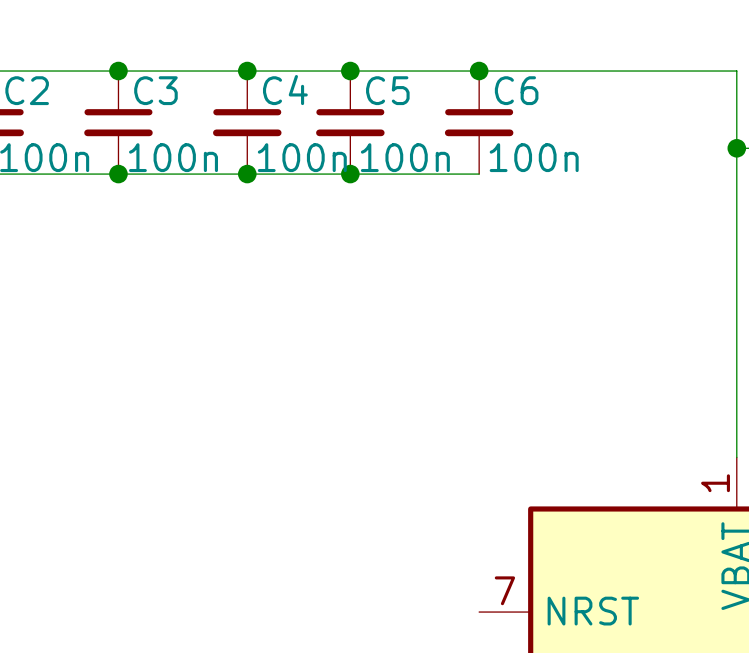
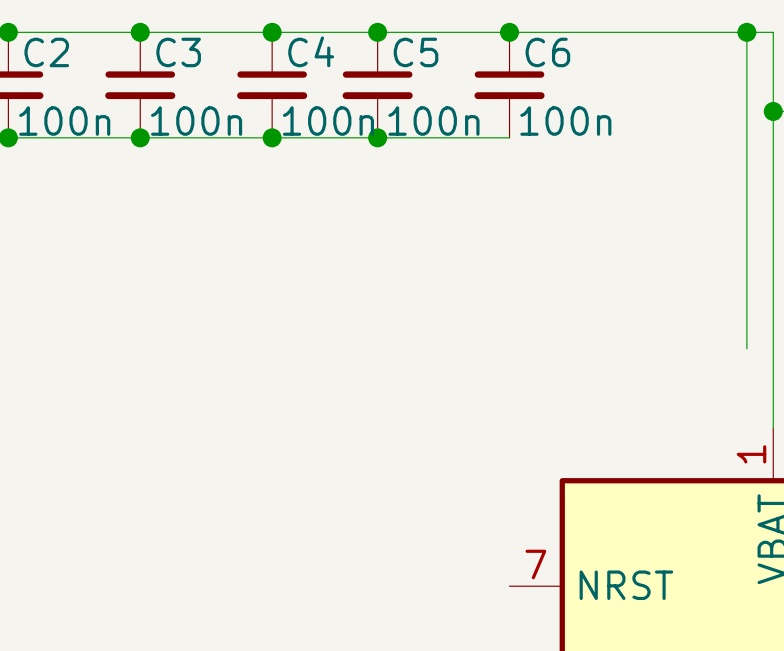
wire: none -> (746, 32) (746, 348)
junction: none -> (746, 32)

